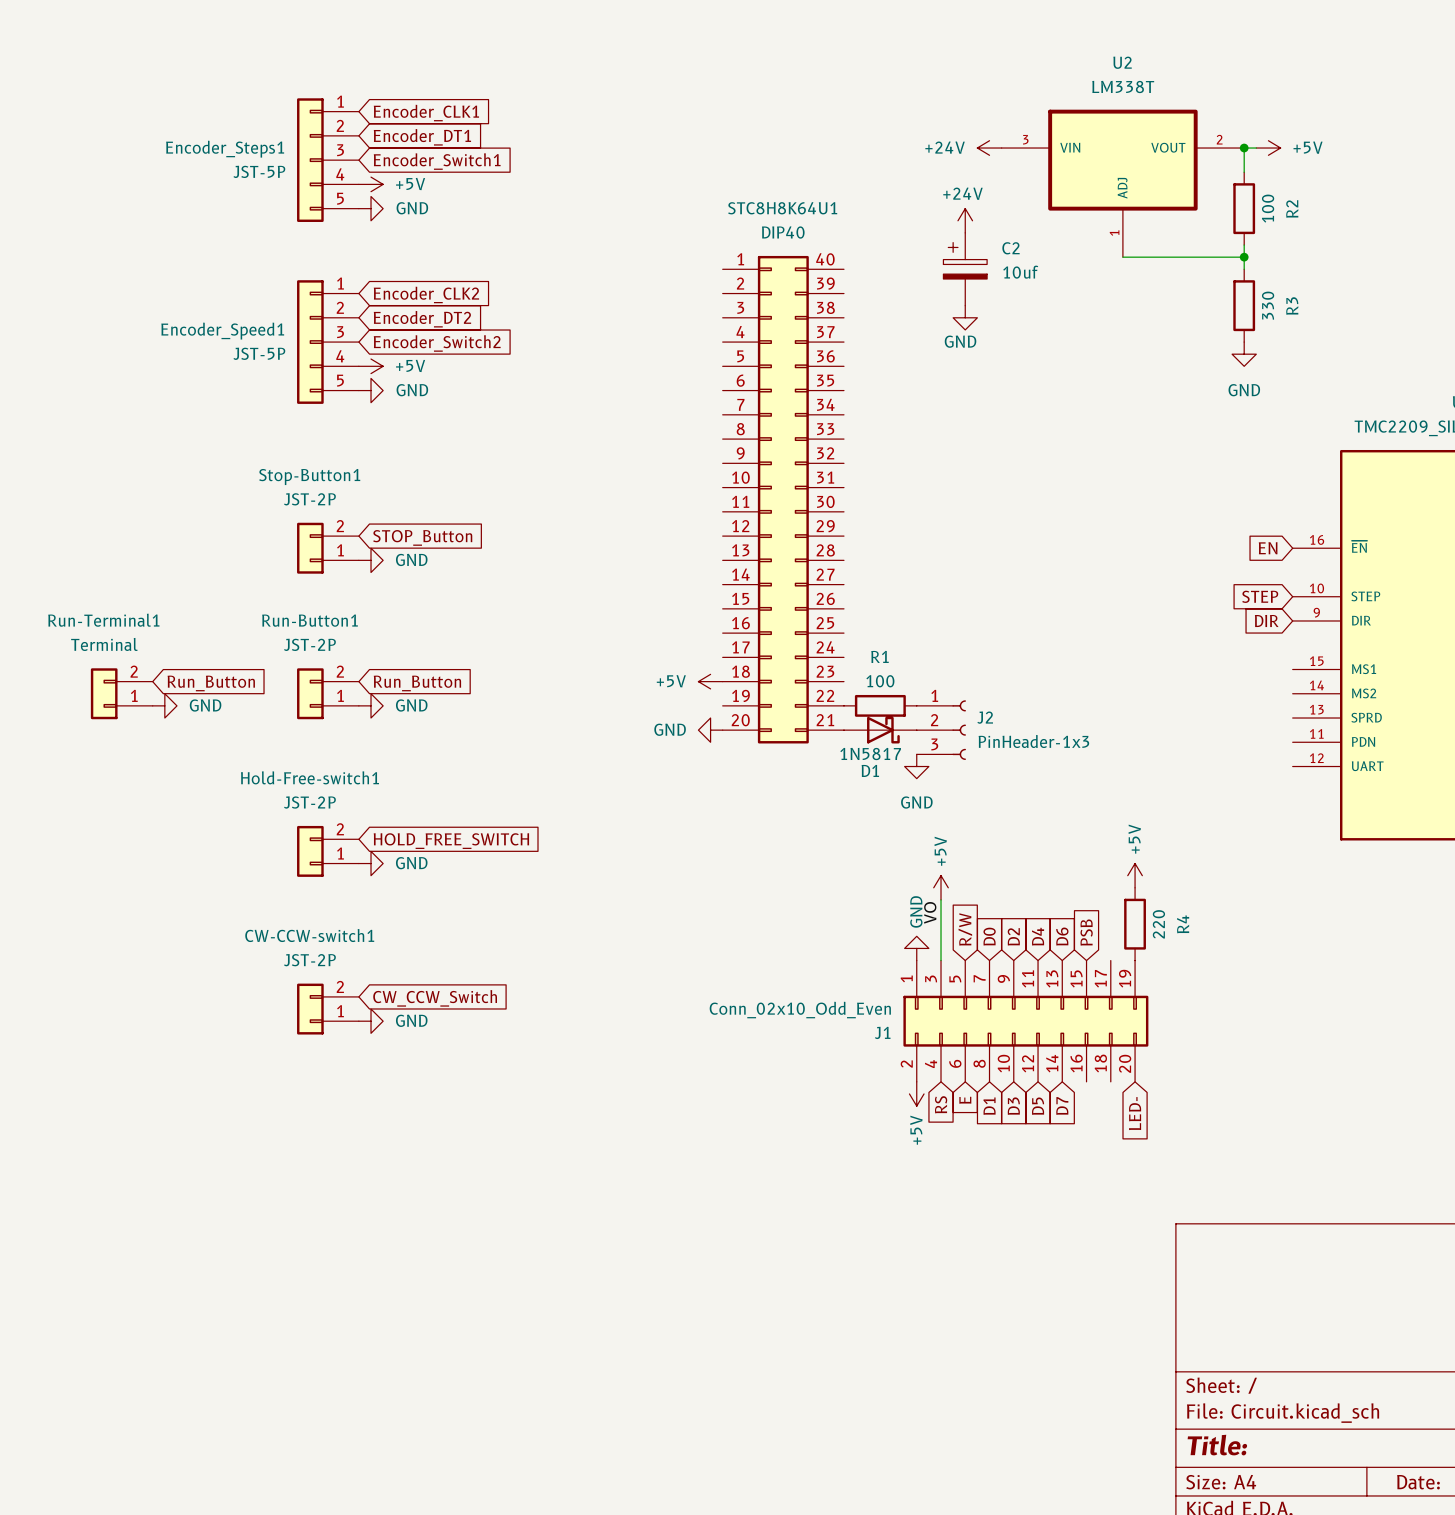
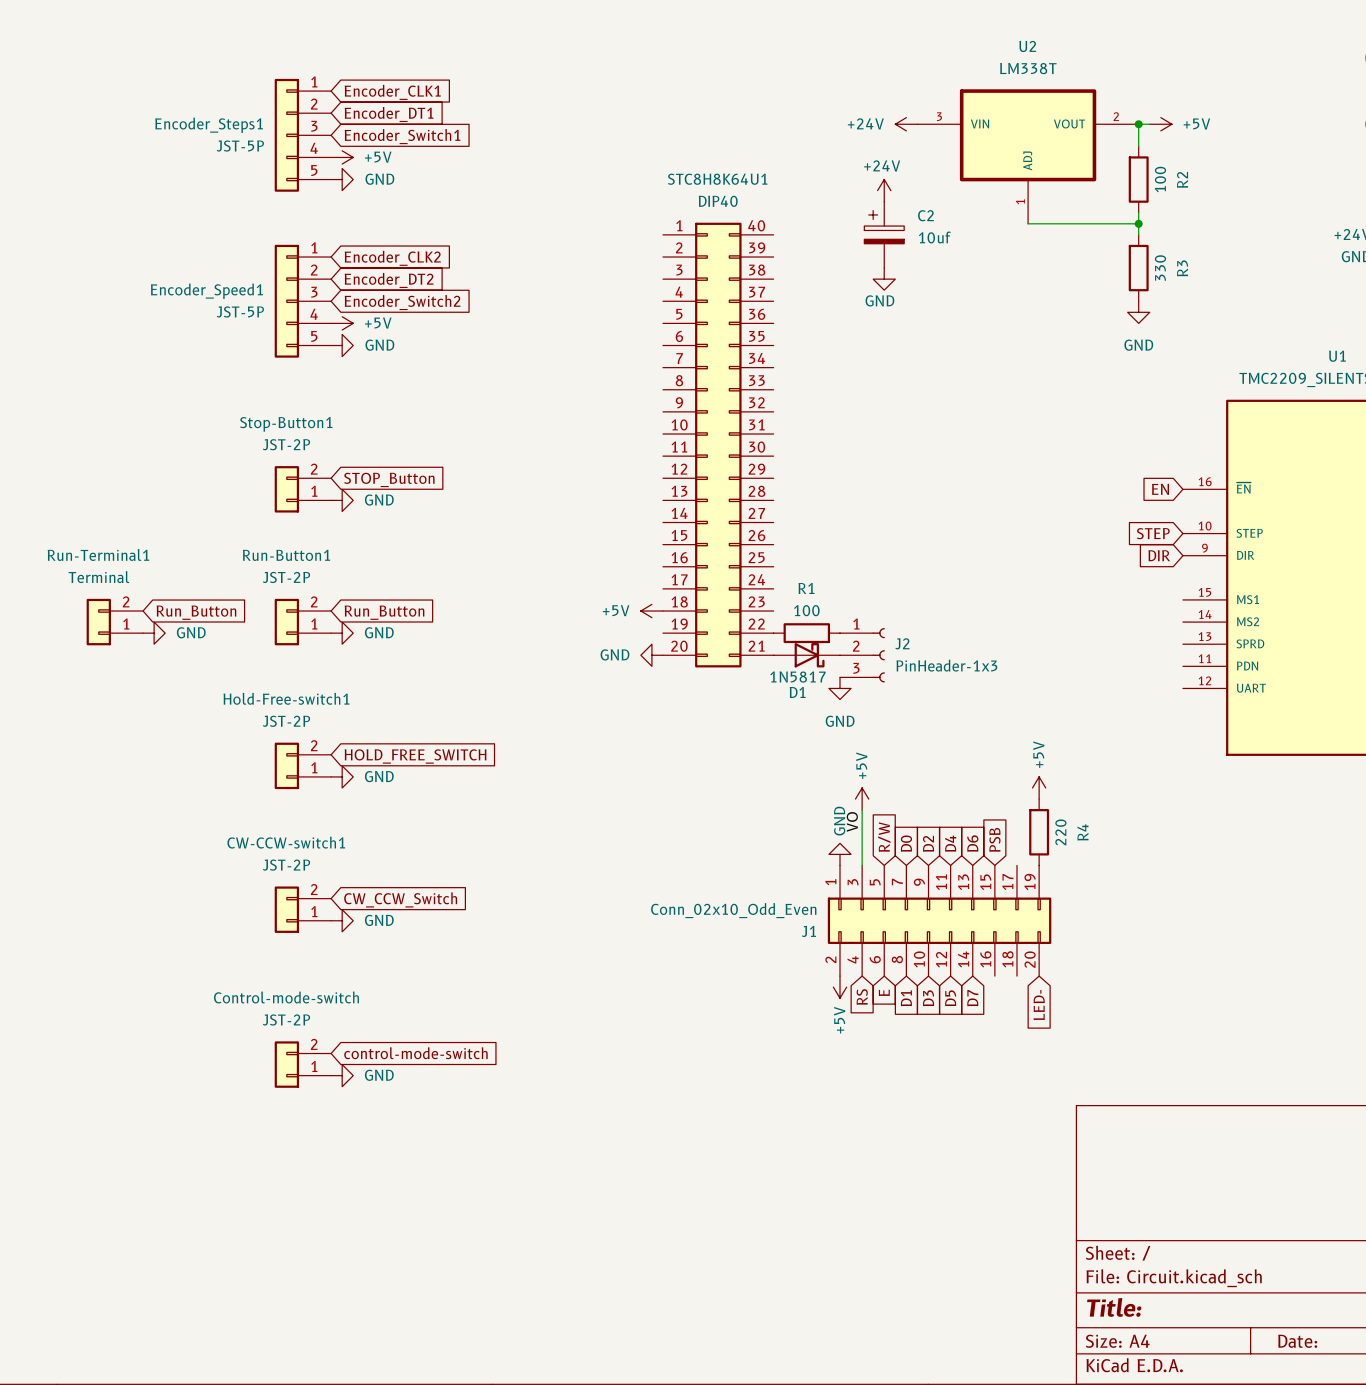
global label: none -> control-mode-switch (415, 1053)
Control-mode-switch: none -> JST-2P (302, 1064)
power symbol: none -> GND (342, 1075)

